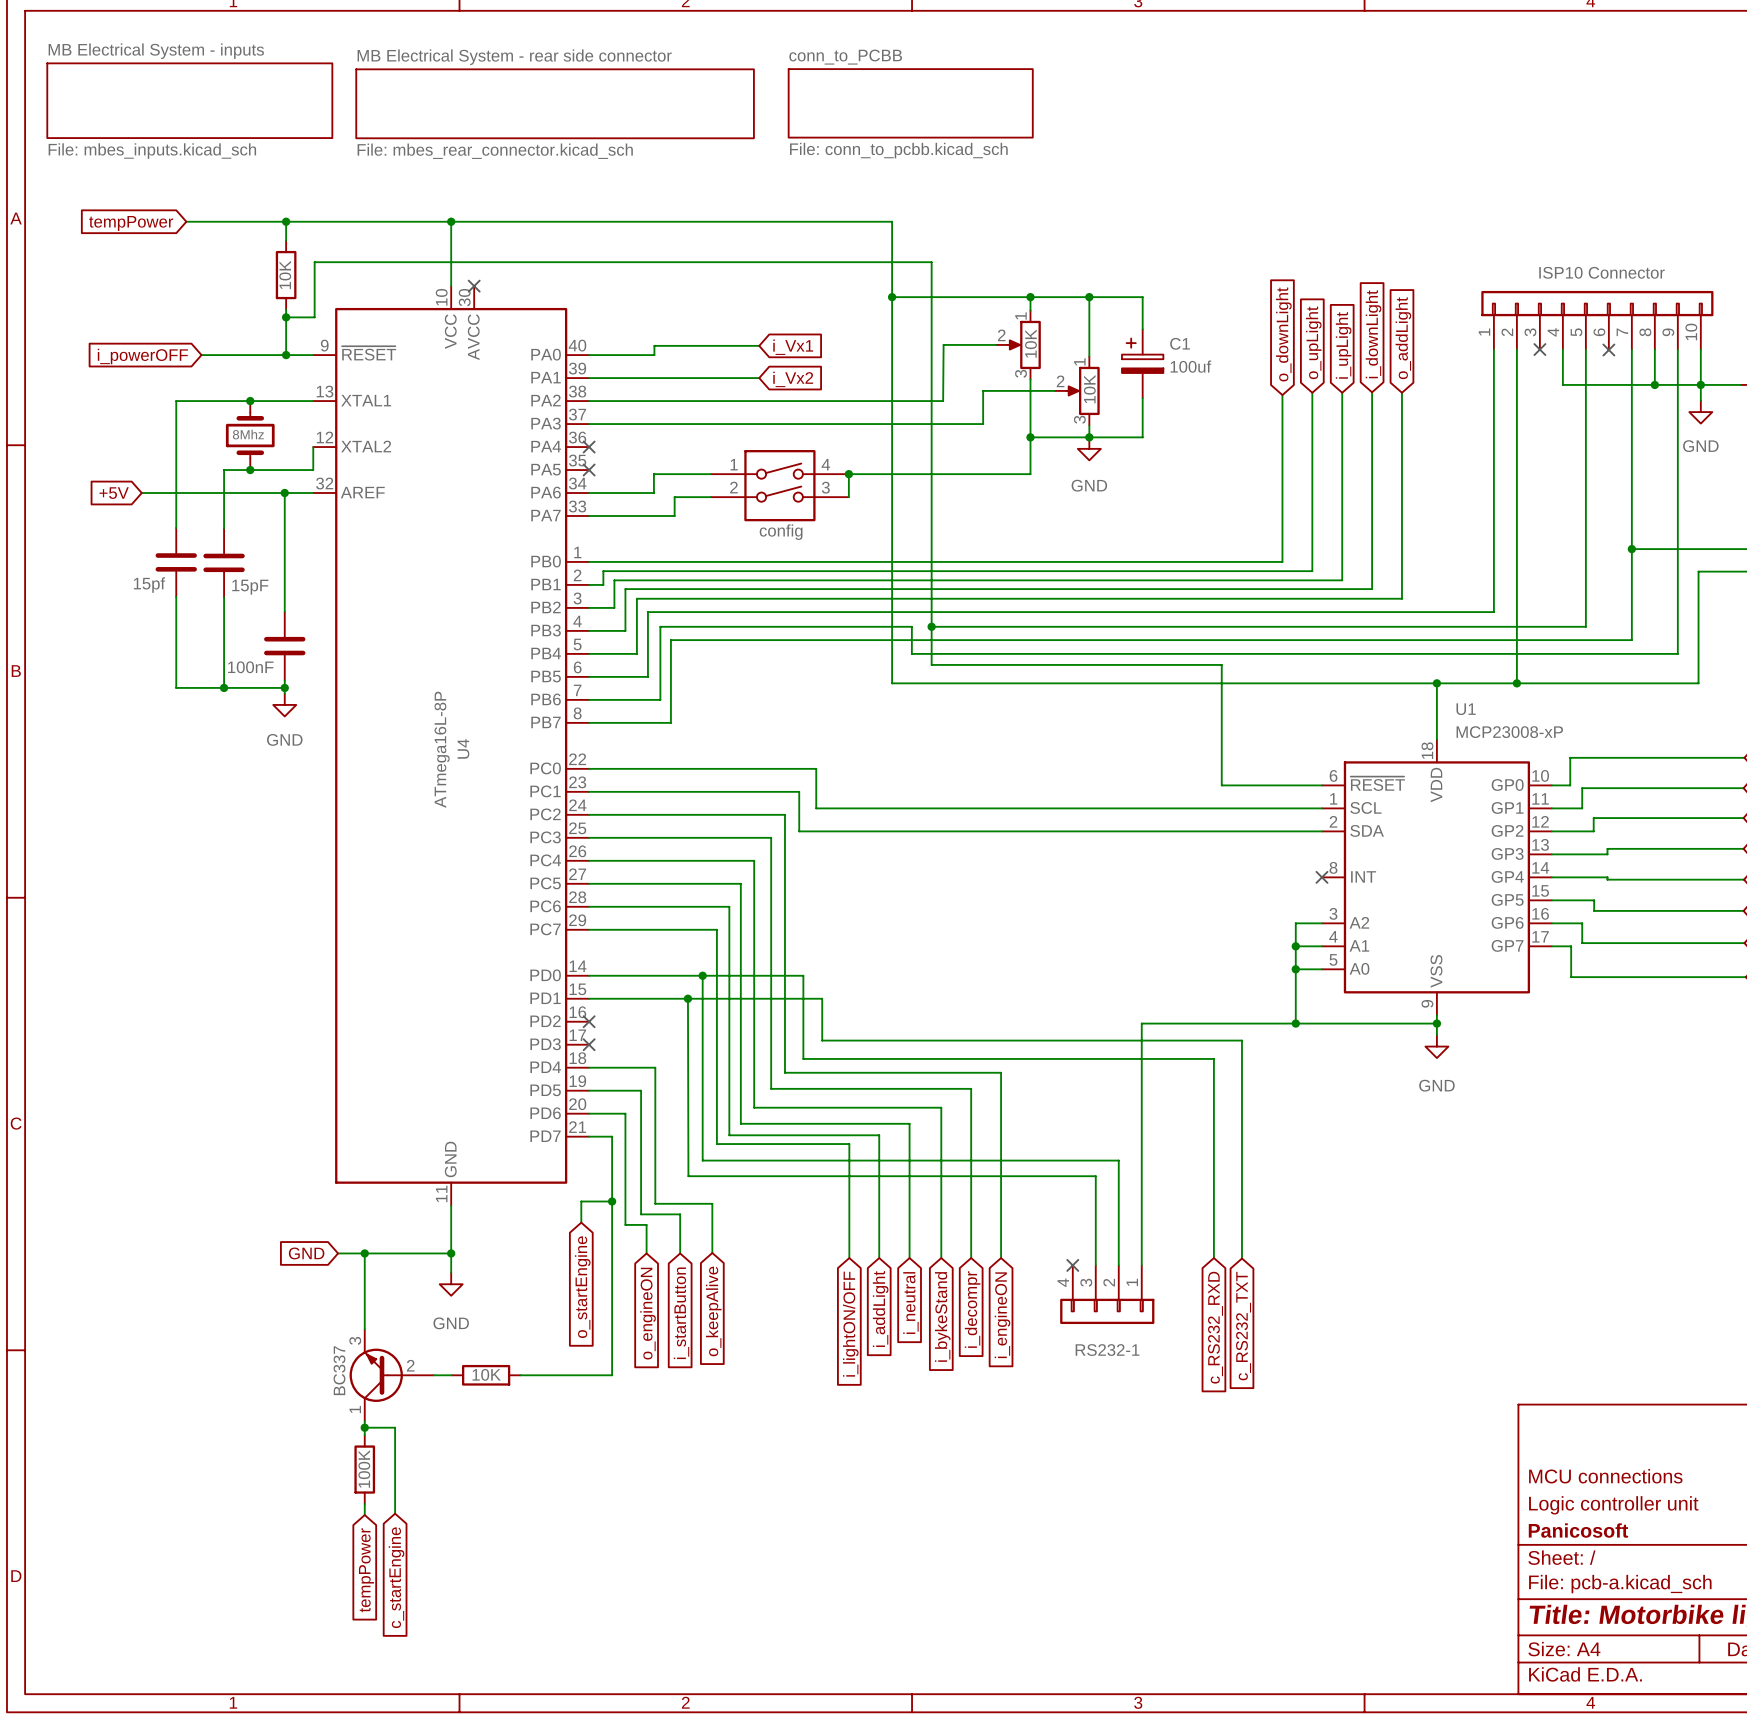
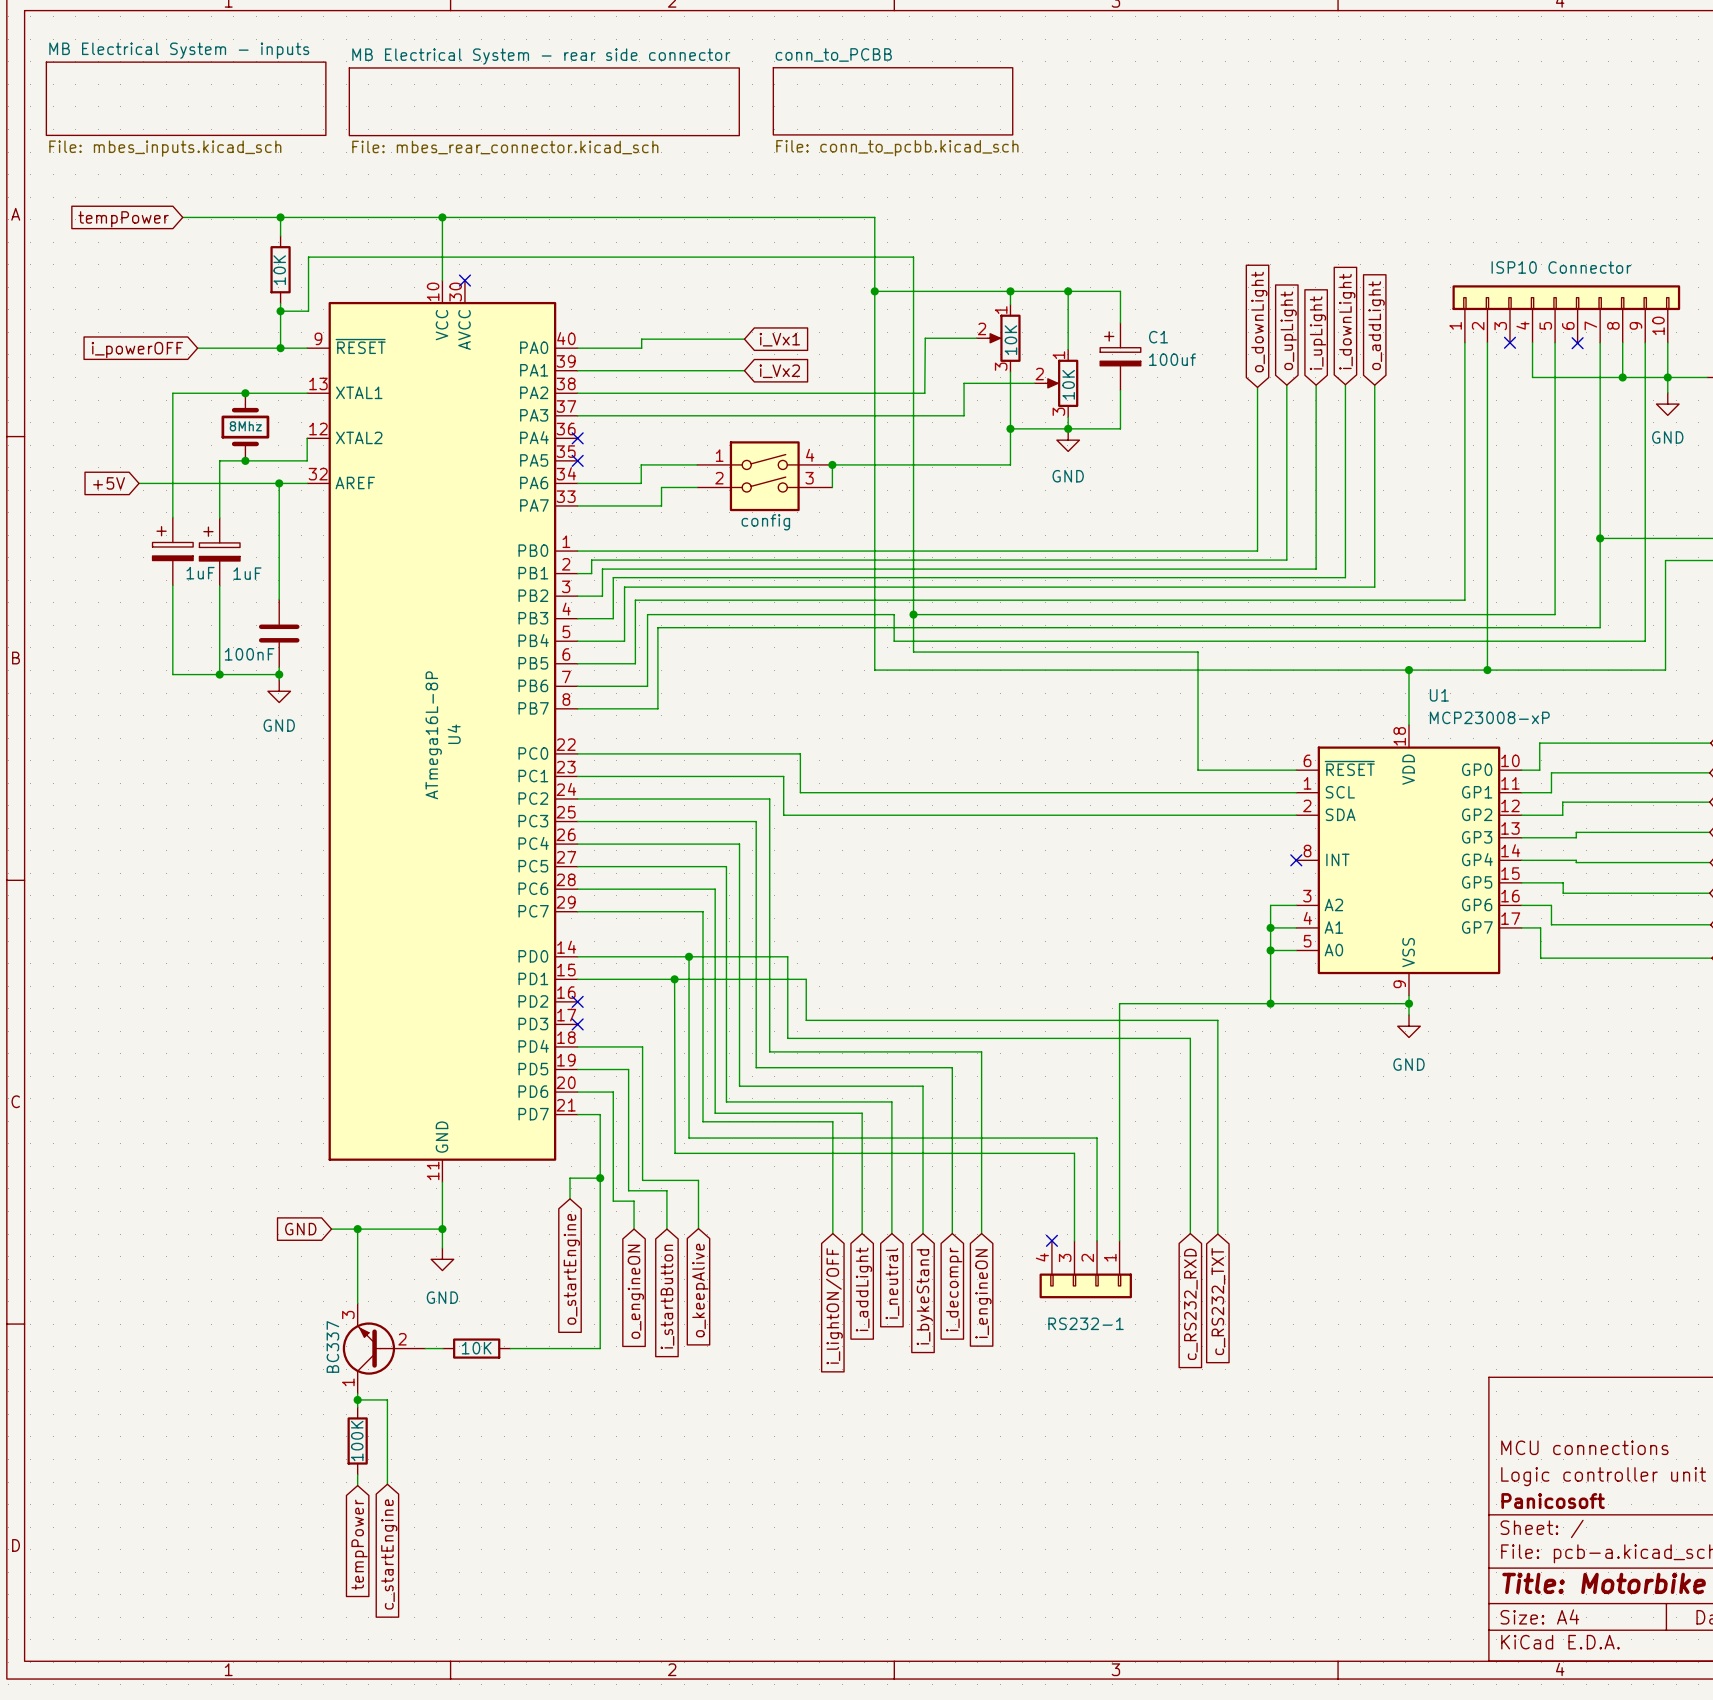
part symbol: [155, 527, 197, 597] -> [152, 517, 194, 586]
part symbol: [203, 528, 245, 598] -> [199, 518, 241, 586]
part value: 15pf (149, 585) -> 1uF (200, 573)
part value: 15pF (250, 587) -> 1uF (247, 573)

